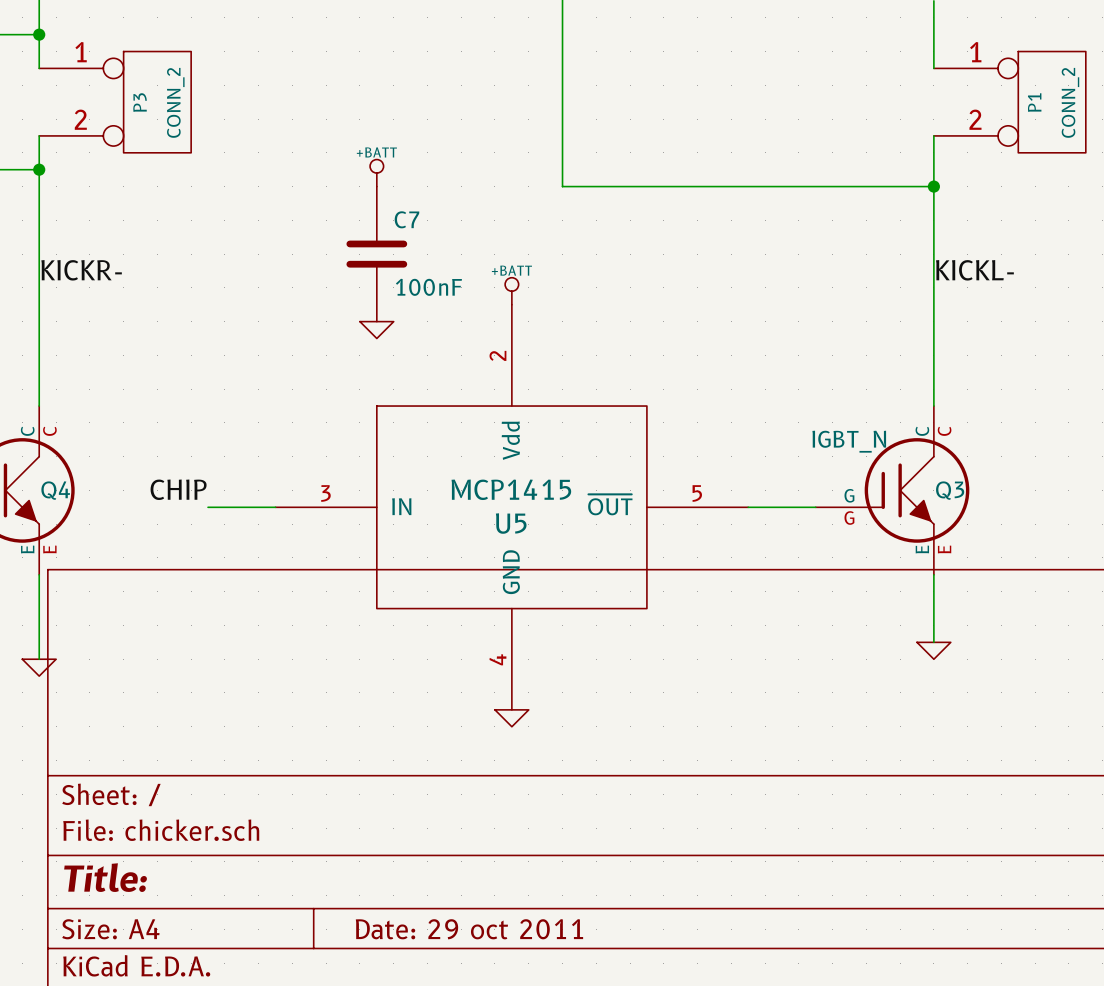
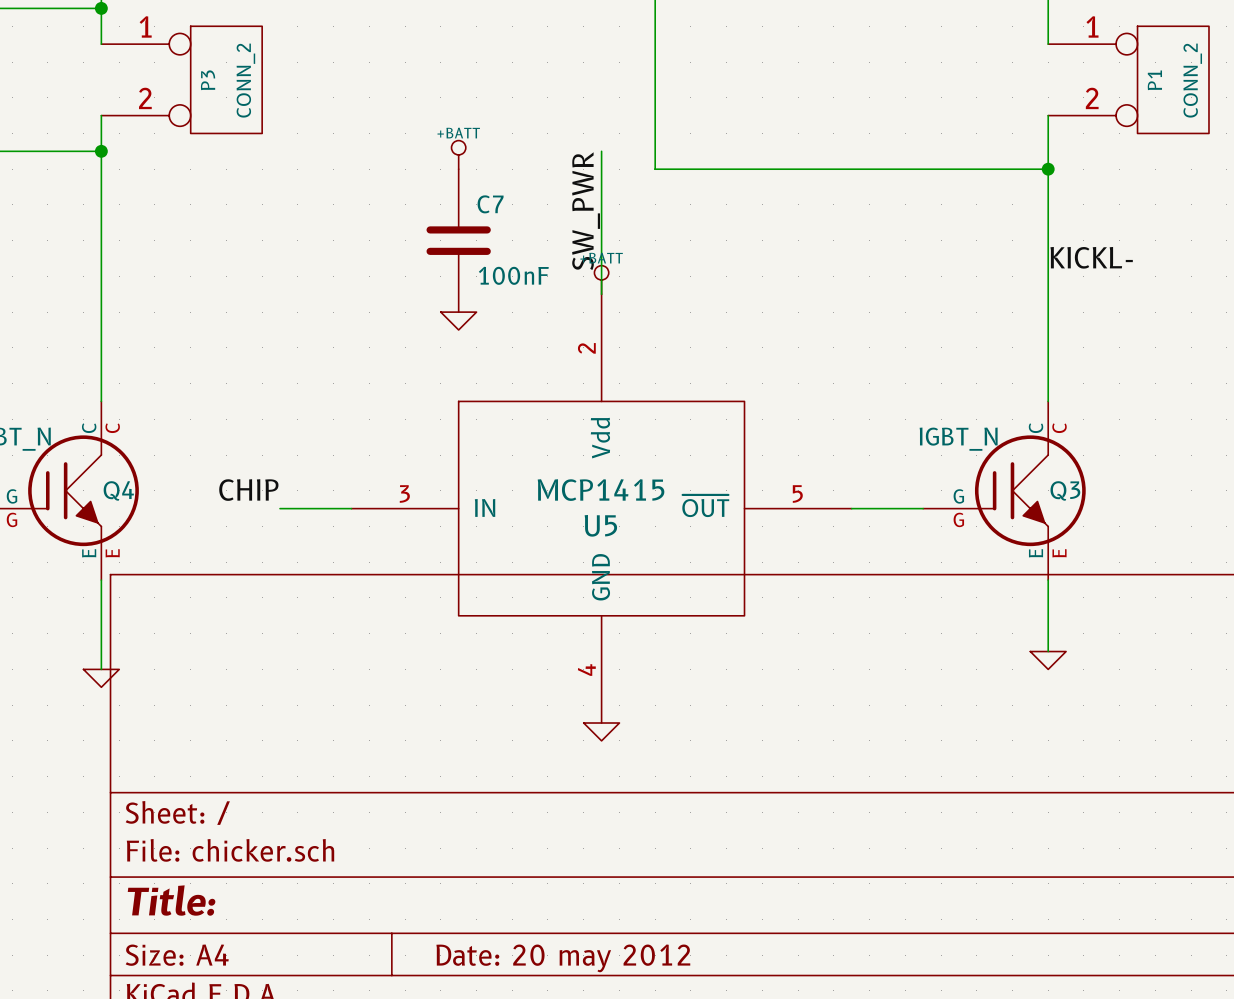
wire: none -> (601, 151) (601, 294)
label: none -> SW_PWR (586, 211)
label: KICKR- (81, 270) -> none
title block: Date: 29 oct 2011 (469, 929) -> Date: 20 may 2012 (563, 958)

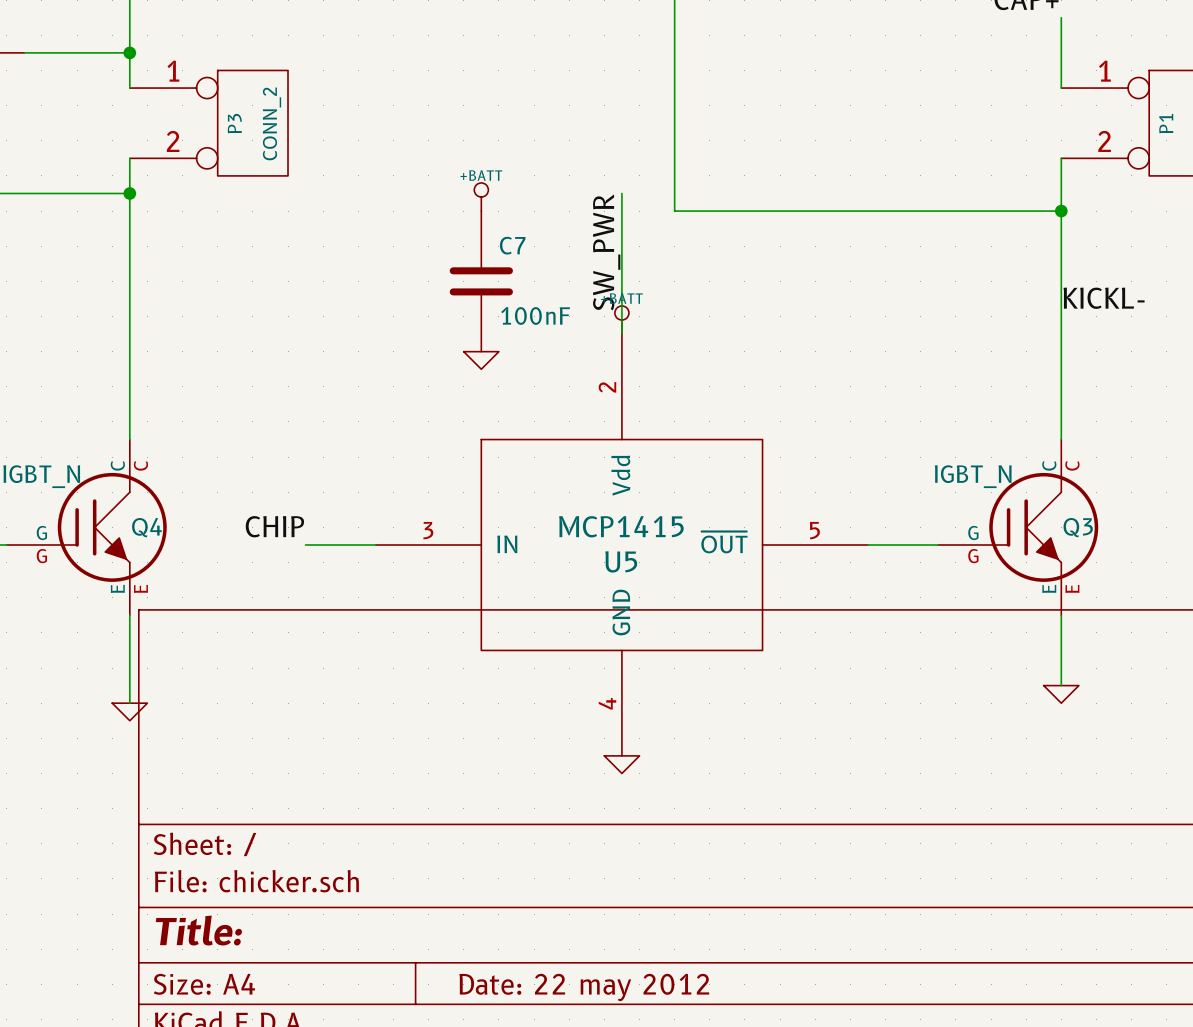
title block: Date: 20 may 2012 (563, 958) -> Date: 22 may 2012 (584, 987)

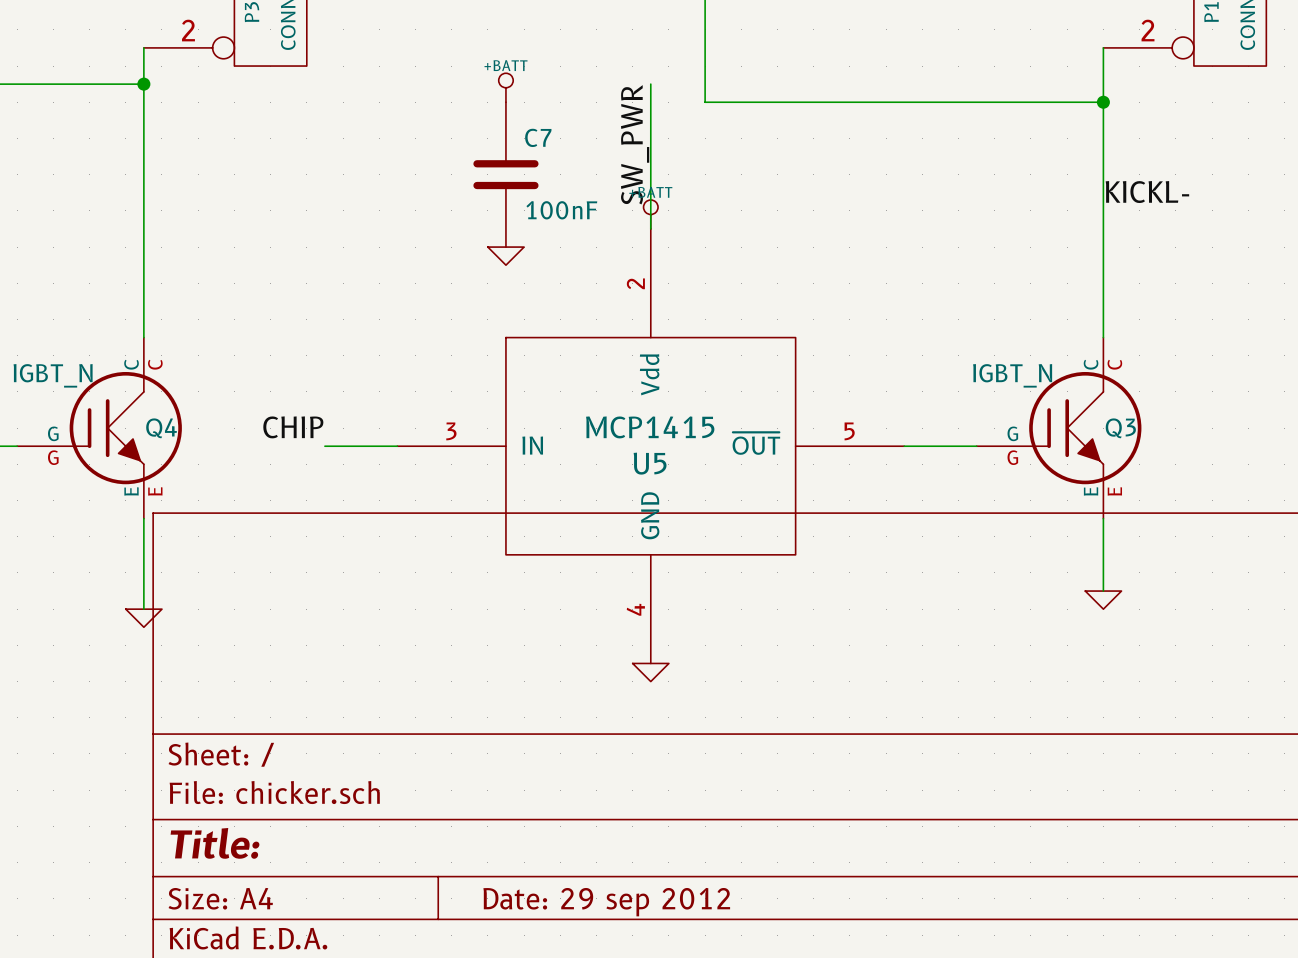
title block: Date: 22 may 2012 (584, 987) -> Date: 29 sep 2012 (606, 902)

